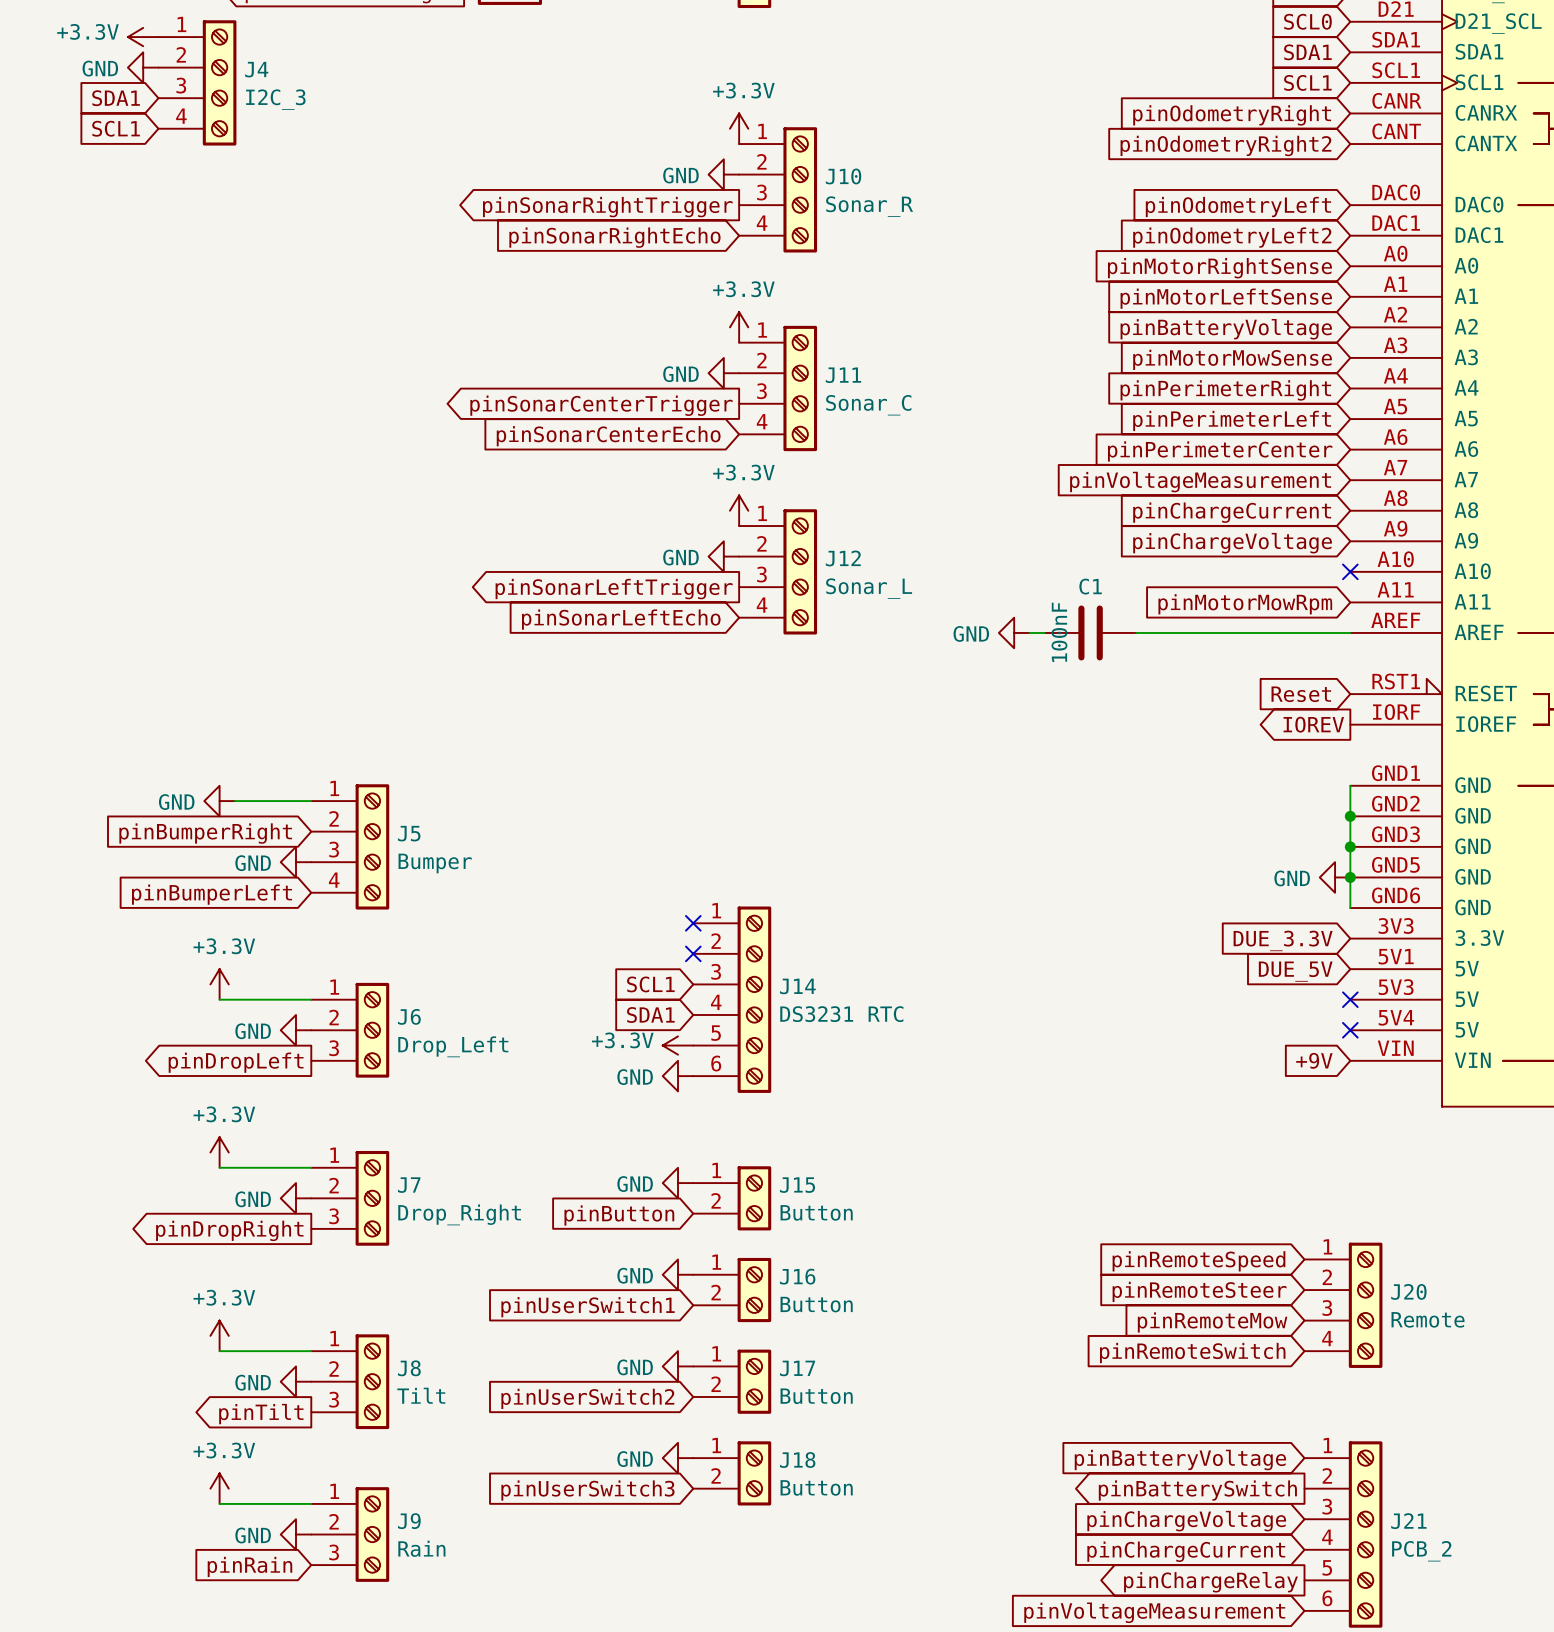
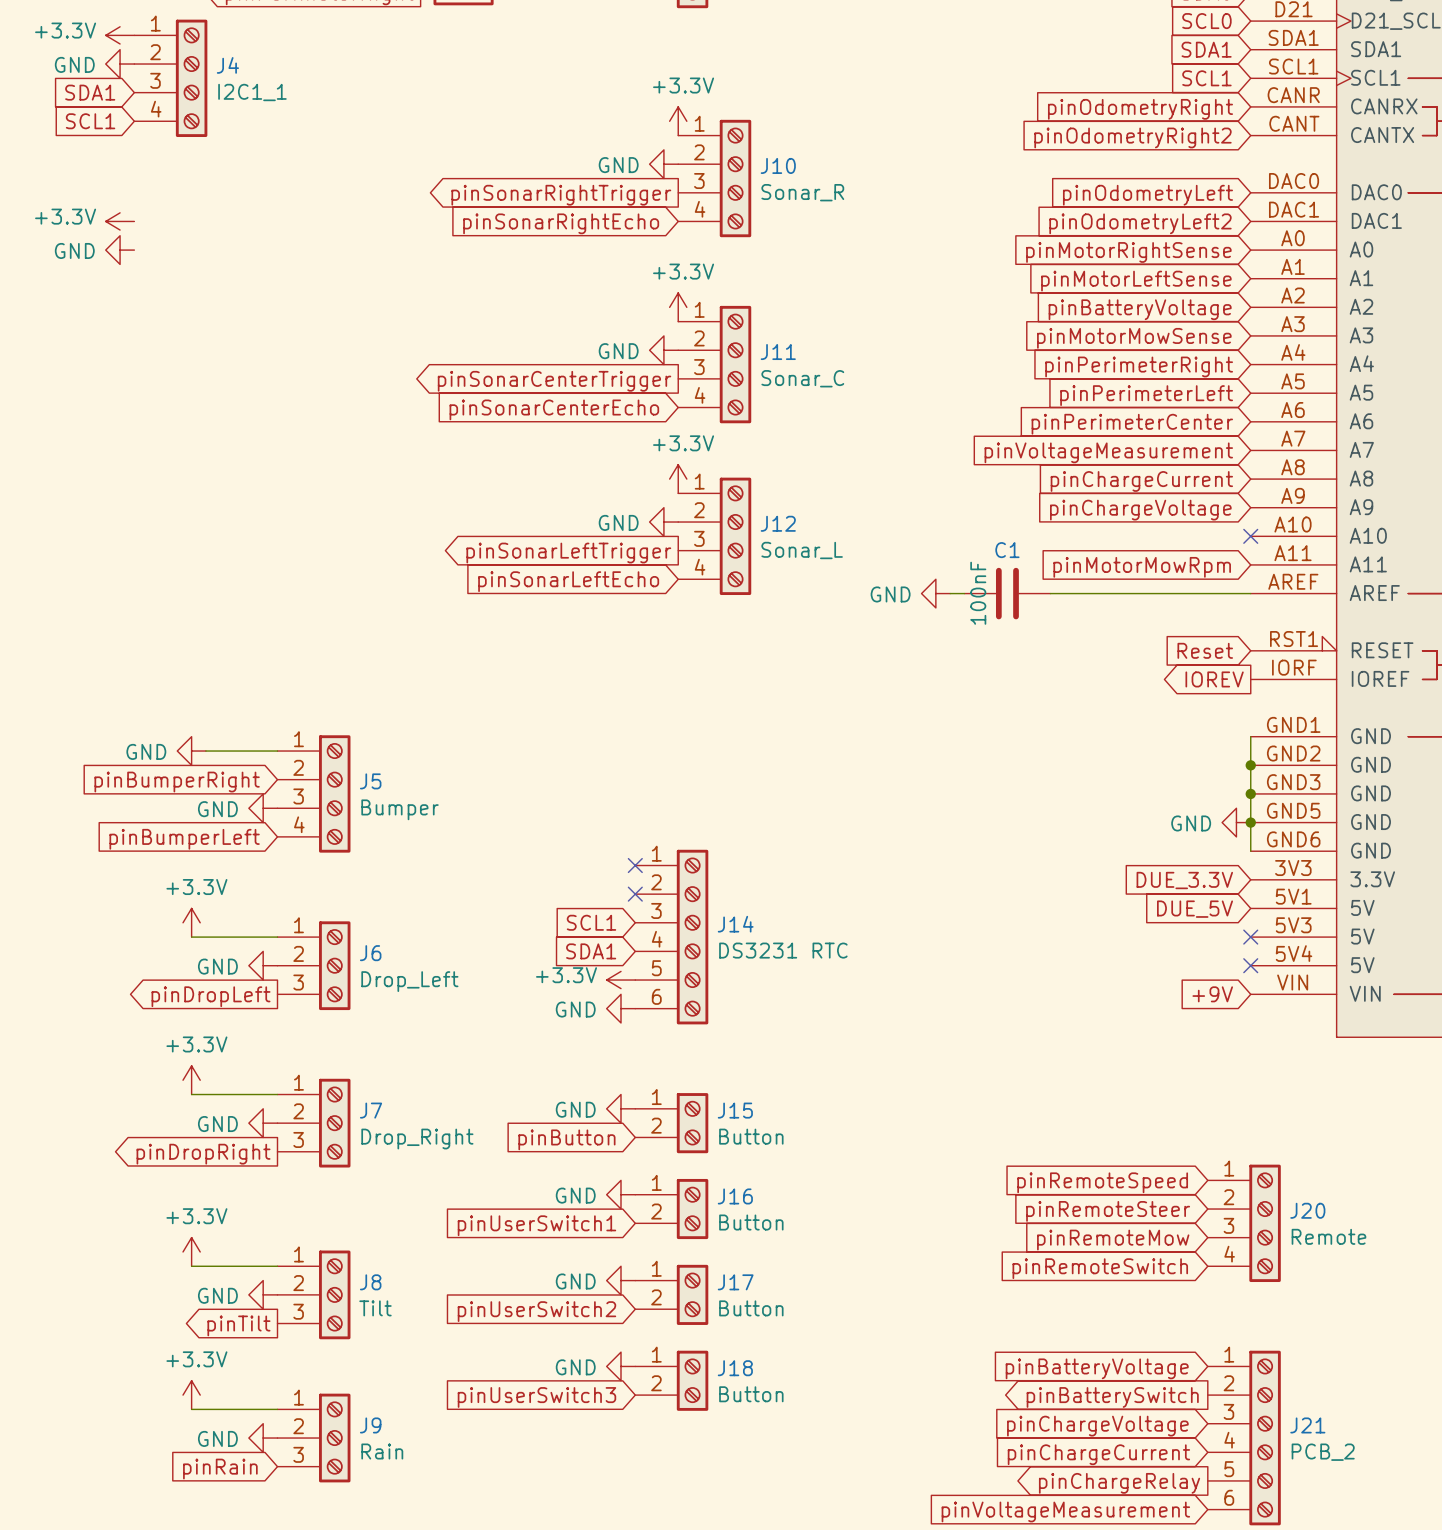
J4 value: I2C_3 (275, 99) -> I2C1_1 (252, 92)
power symbol: none -> +3.3V (120, 221)
power symbol: none -> GND (120, 250)

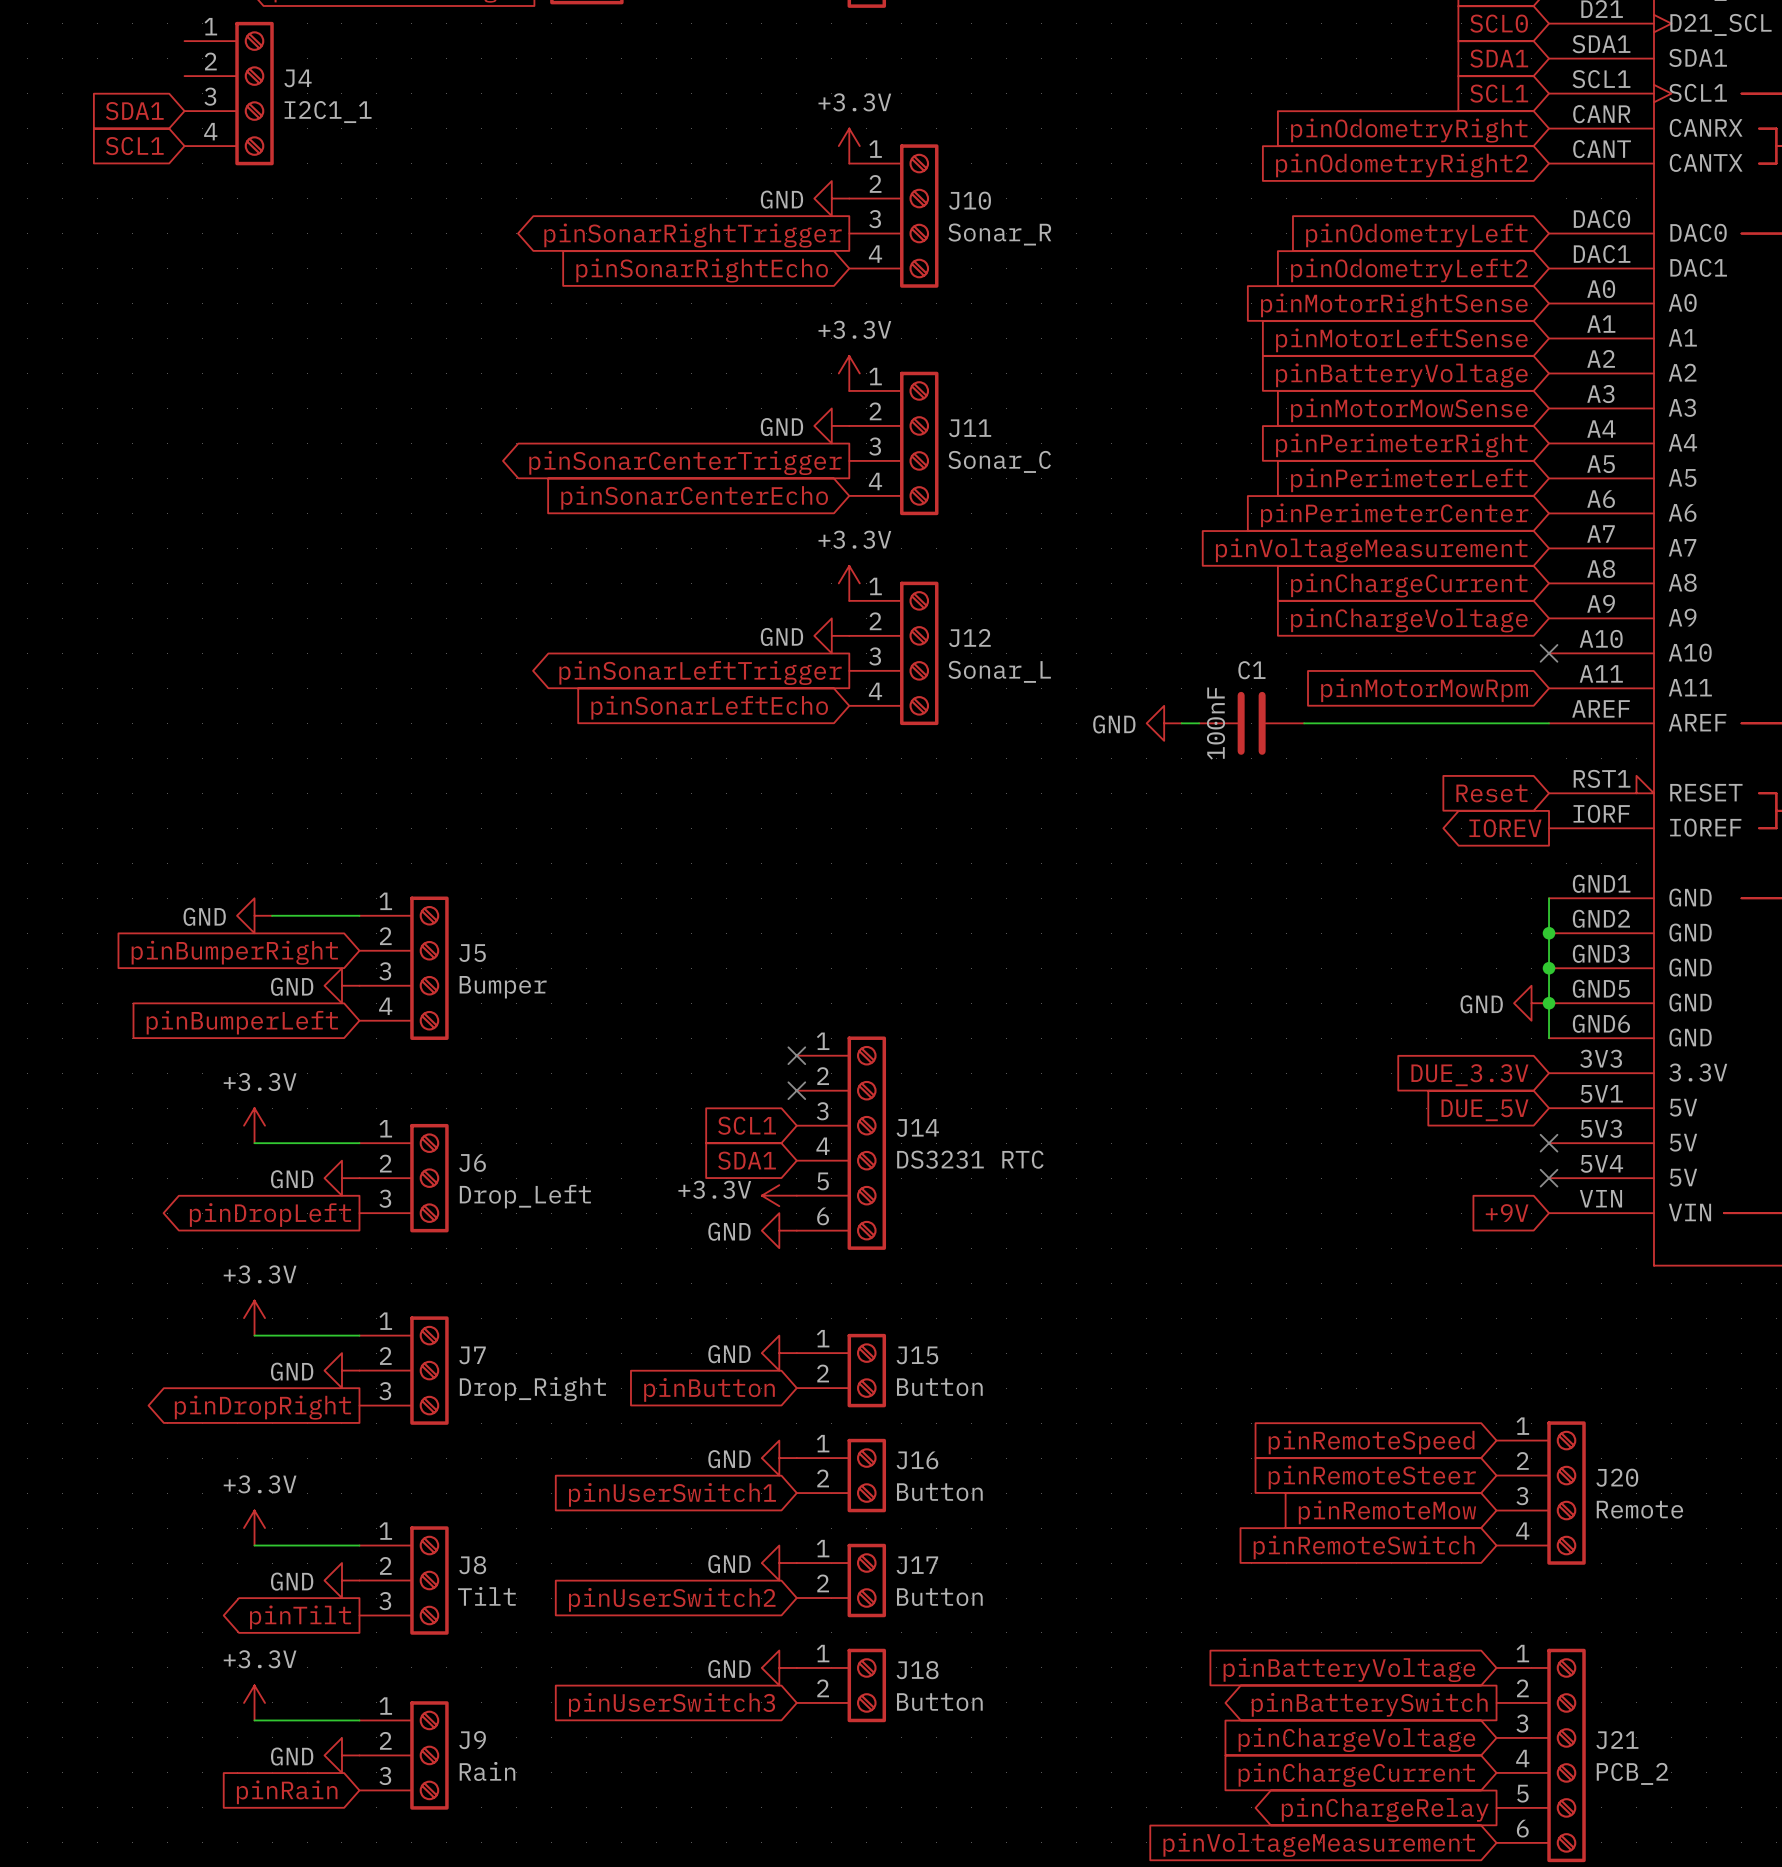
power symbol: +3.3V (120, 35) -> none
power symbol: GND (120, 64) -> none
power symbol: +3.3V (120, 221) -> none
power symbol: GND (120, 250) -> none

